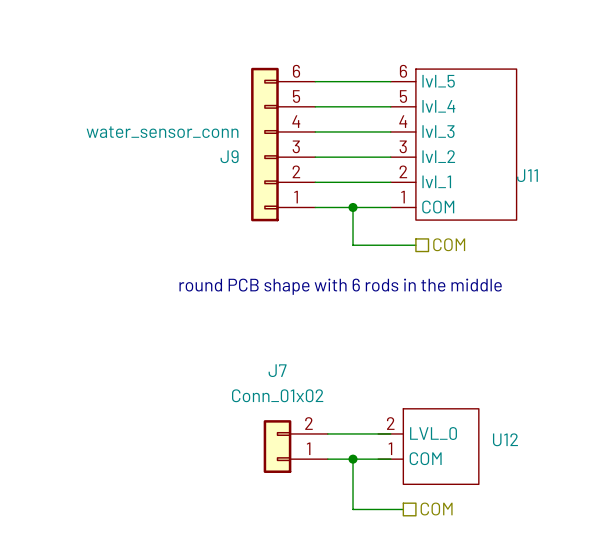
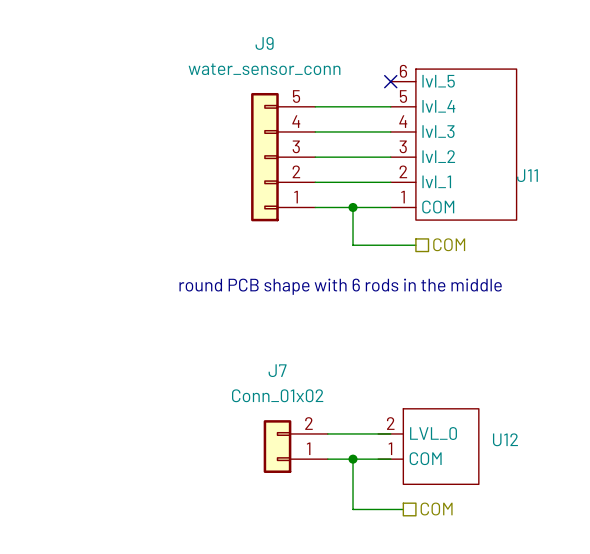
J9 symbol: [251, 67, 316, 222] -> [251, 92, 316, 222]
wire: (315, 81) (390, 81) -> none
no-connect mark: none -> (390, 81)
J9 value position: water_sensor_conn (162, 132) -> water_sensor_conn (264, 69)
J9 name position: J9 (229, 156) -> J9 (264, 43)

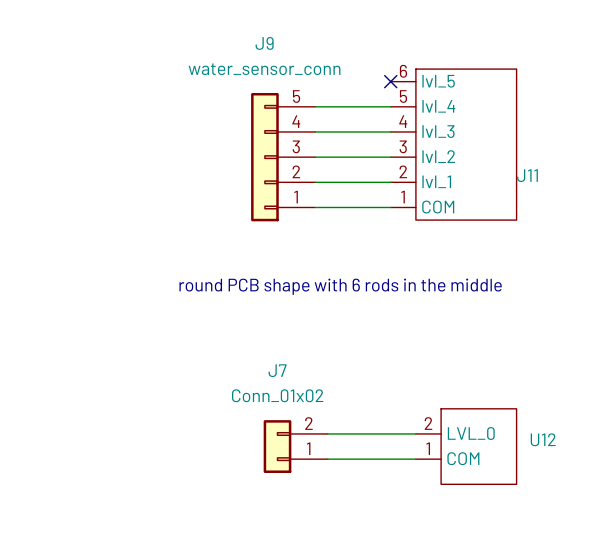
wire: (353, 207) (353, 245) (415, 245) -> none
junction: (353, 207) -> none
hierarchical label: COM (449, 244) -> none
U12 position: (428, 446) -> (466, 446)
wire: (353, 459) (353, 509) (403, 509) -> none
junction: (353, 459) -> none
hierarchical label: COM (436, 509) -> none

